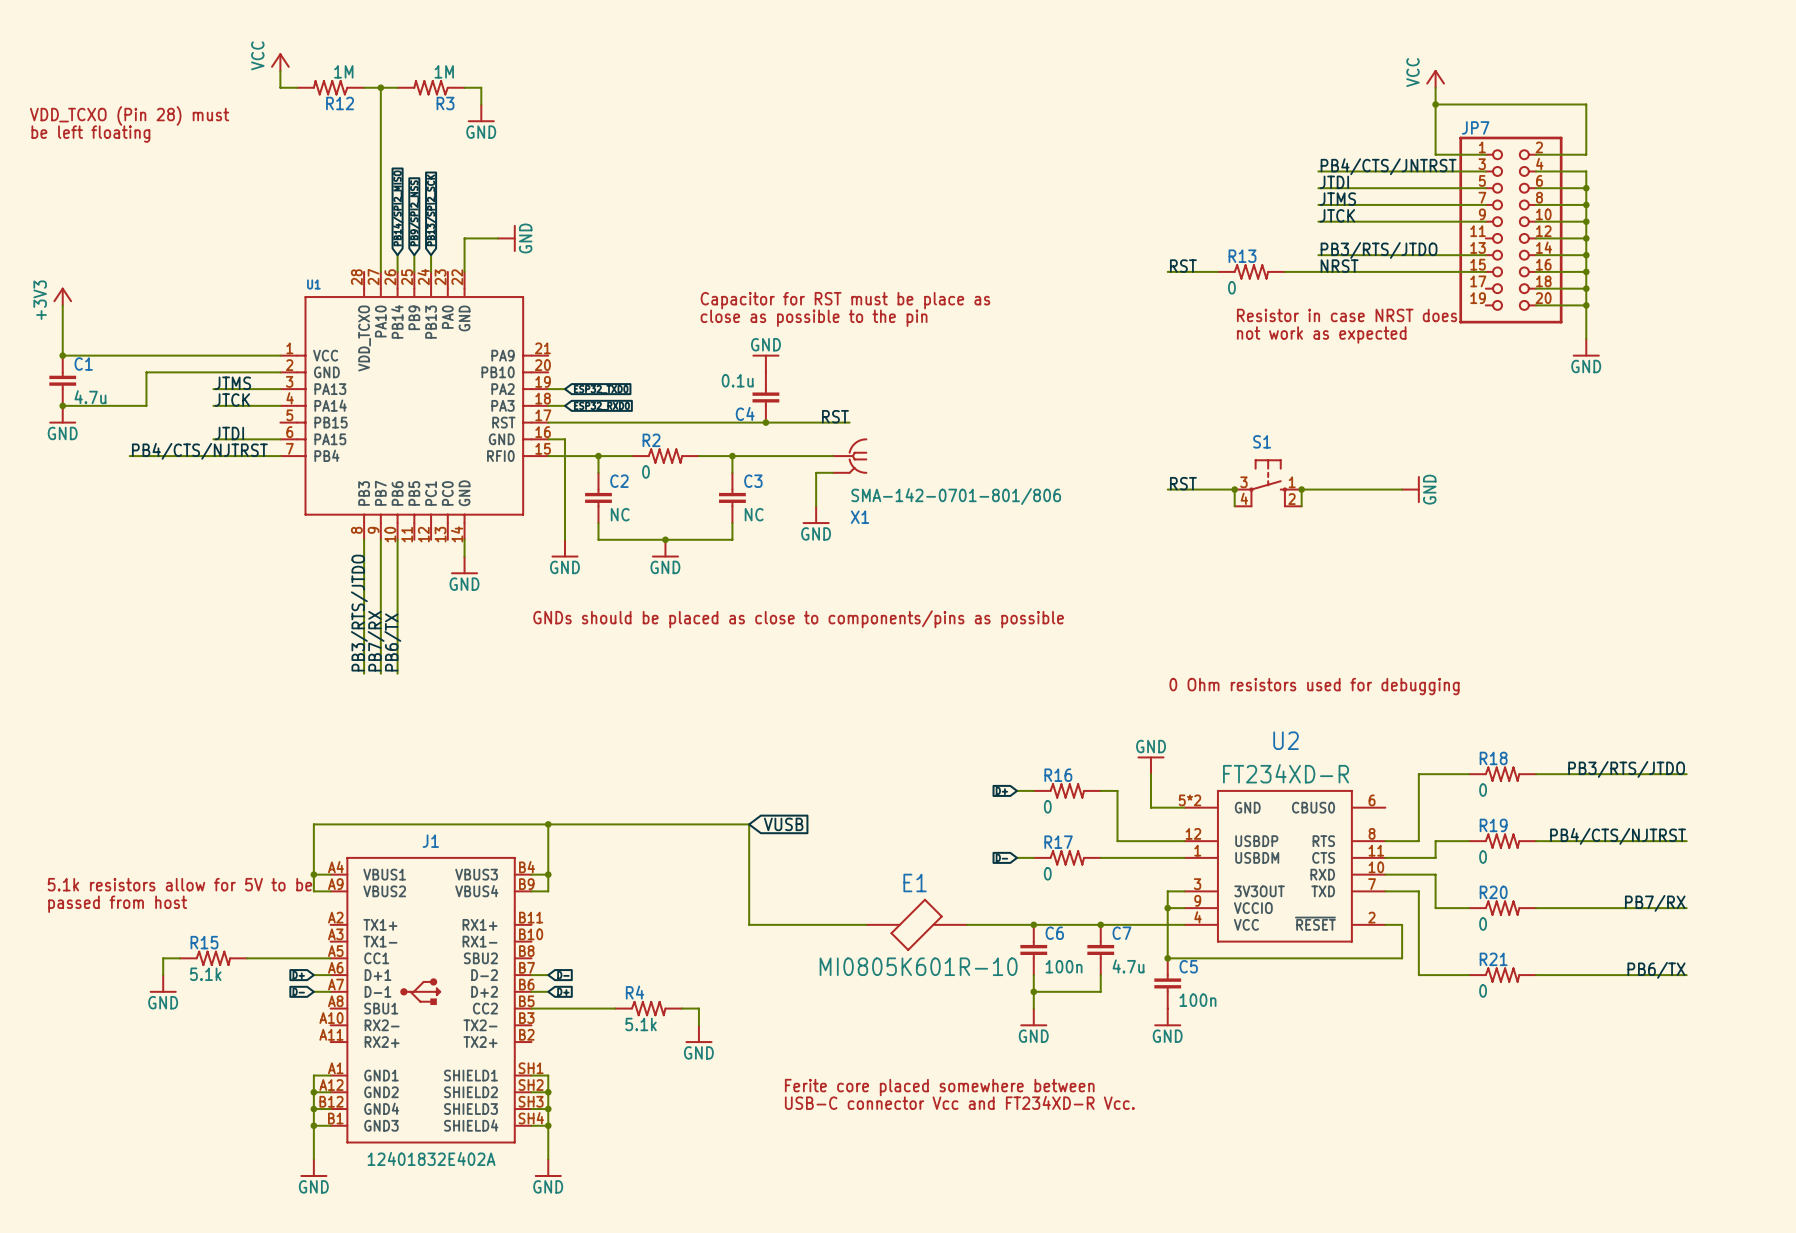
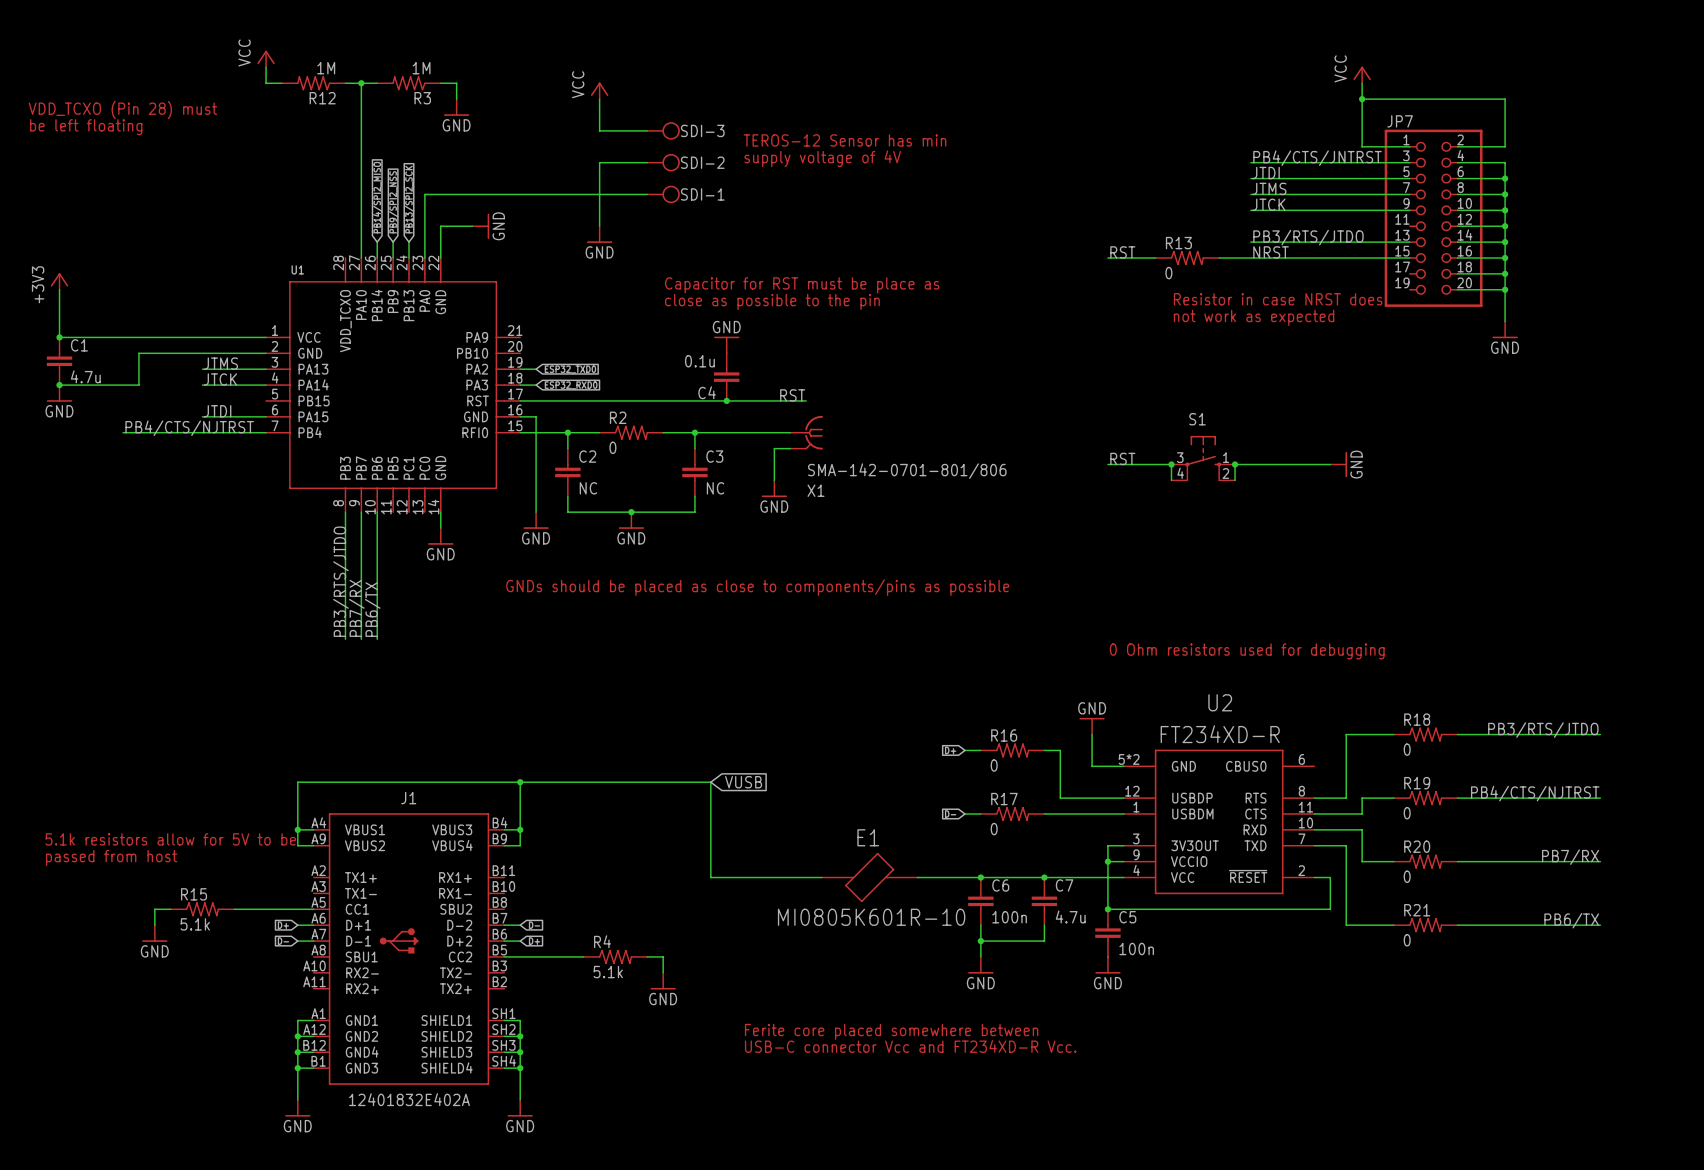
power symbol: none -> VCC (599, 90)
wire: none -> (599, 99) (599, 130) (647, 130)
SDI-3: none -> (663, 130)
text: none -> TEROS-12 Sensor has min (844, 140)
text: none -> supply voltage of 4V (822, 158)
wire: none -> (647, 162) (599, 162) (599, 226)
SDI-2: none -> (663, 162)
wire: none -> (647, 194) (424, 194) (424, 258)
SDI-1: none -> (663, 194)
power symbol: none -> GND (599, 234)

